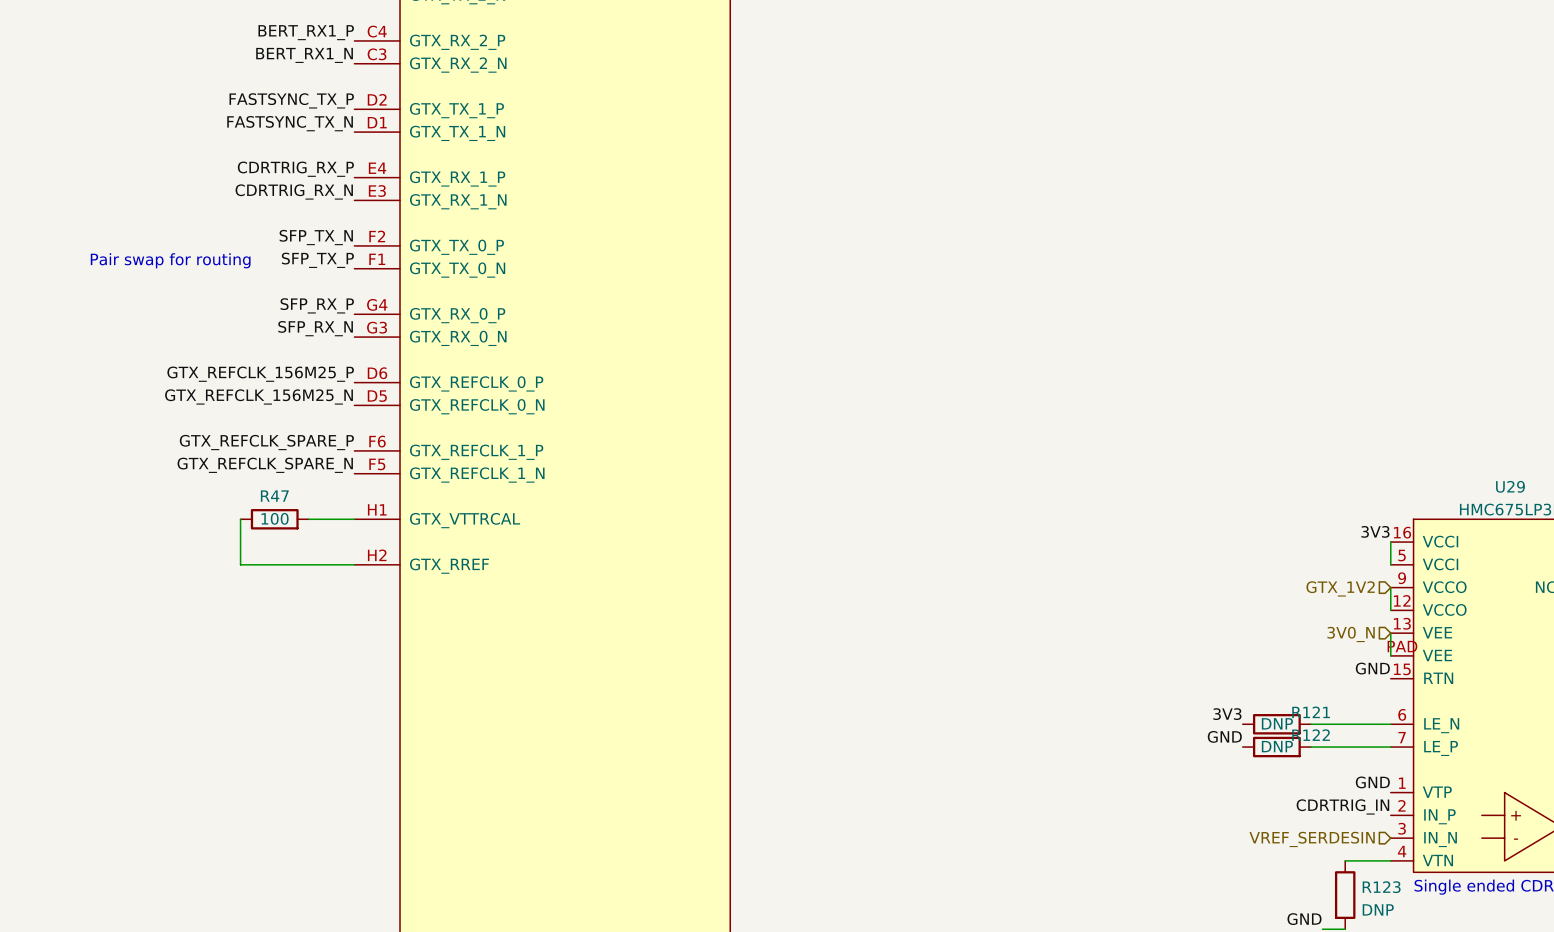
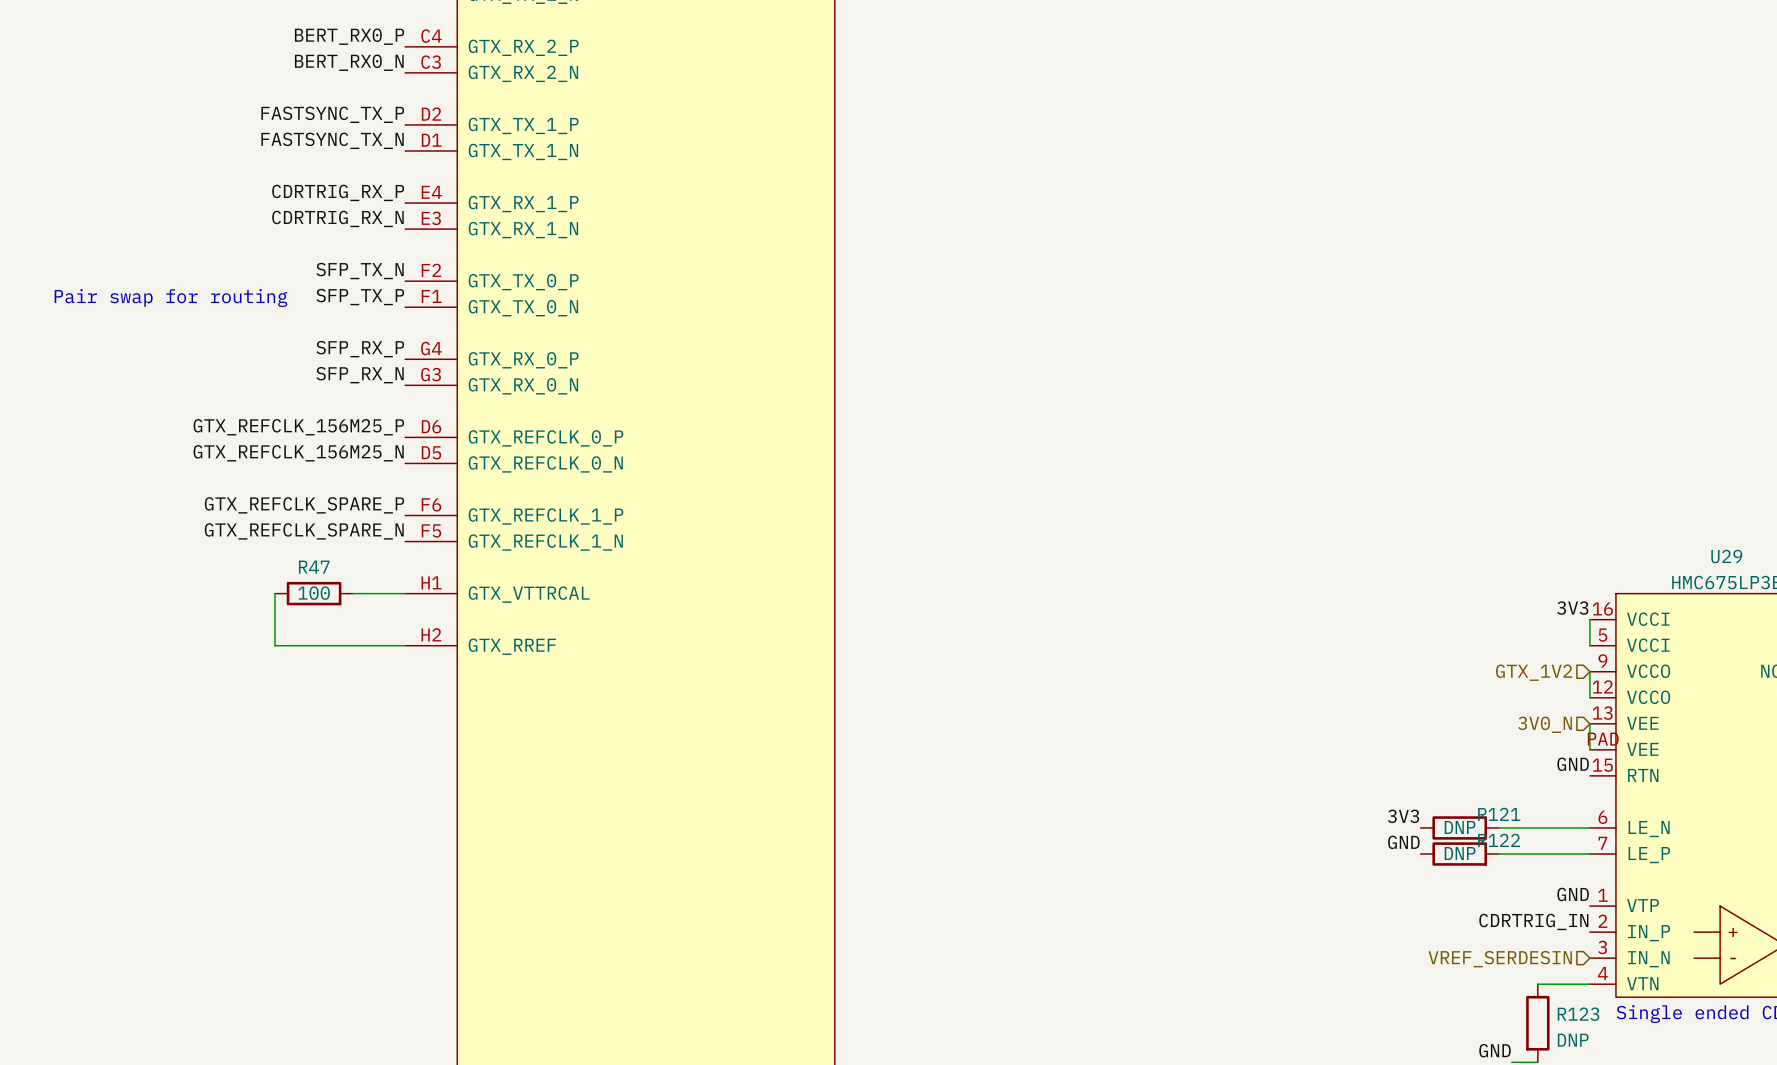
label: BERT_RX1_P (306, 32) -> BERT_RX0_P (349, 36)
label: BERT_RX1_N (304, 55) -> BERT_RX0_N (349, 62)

